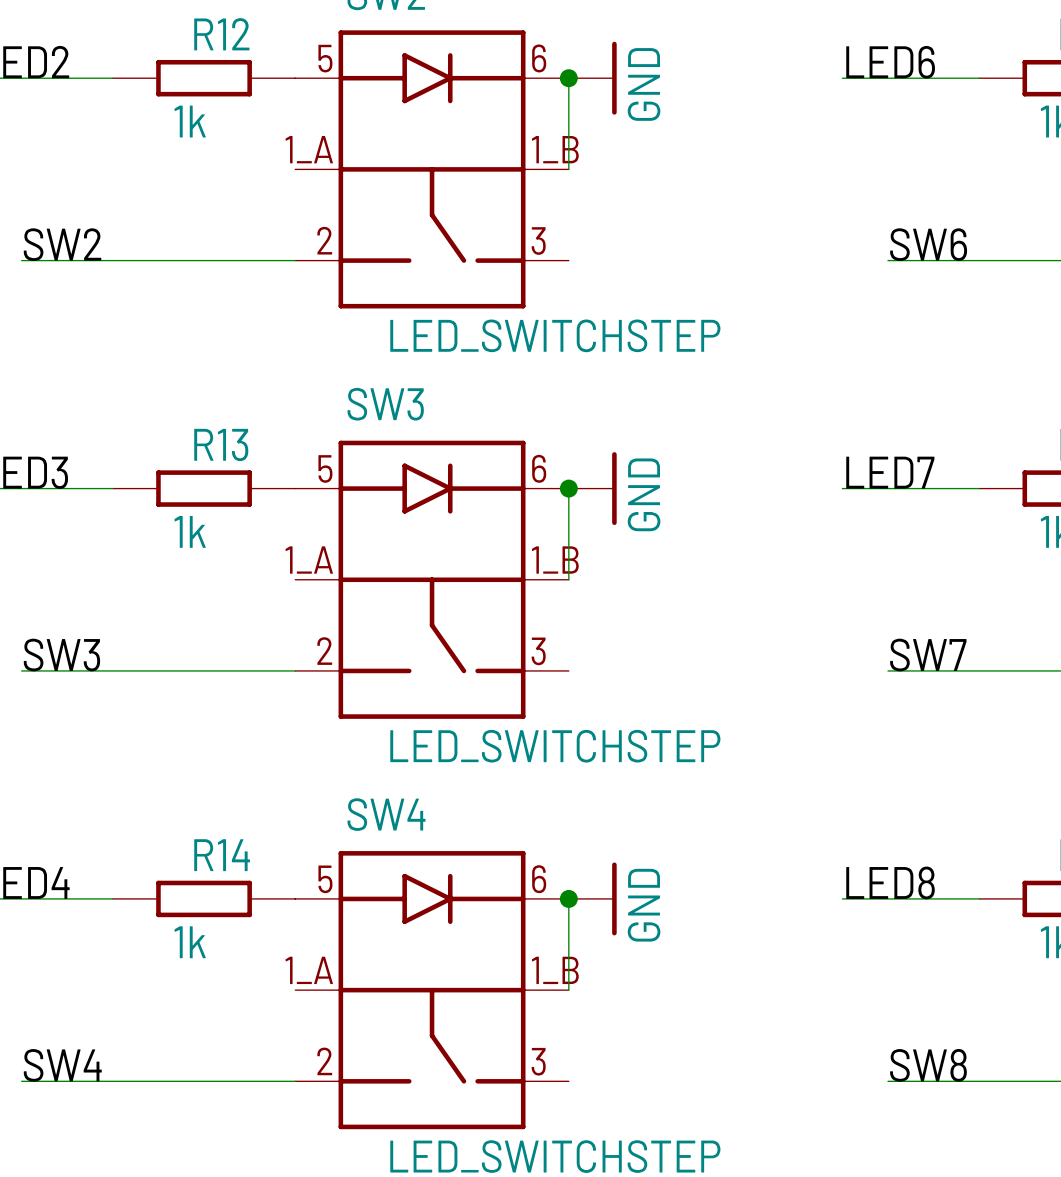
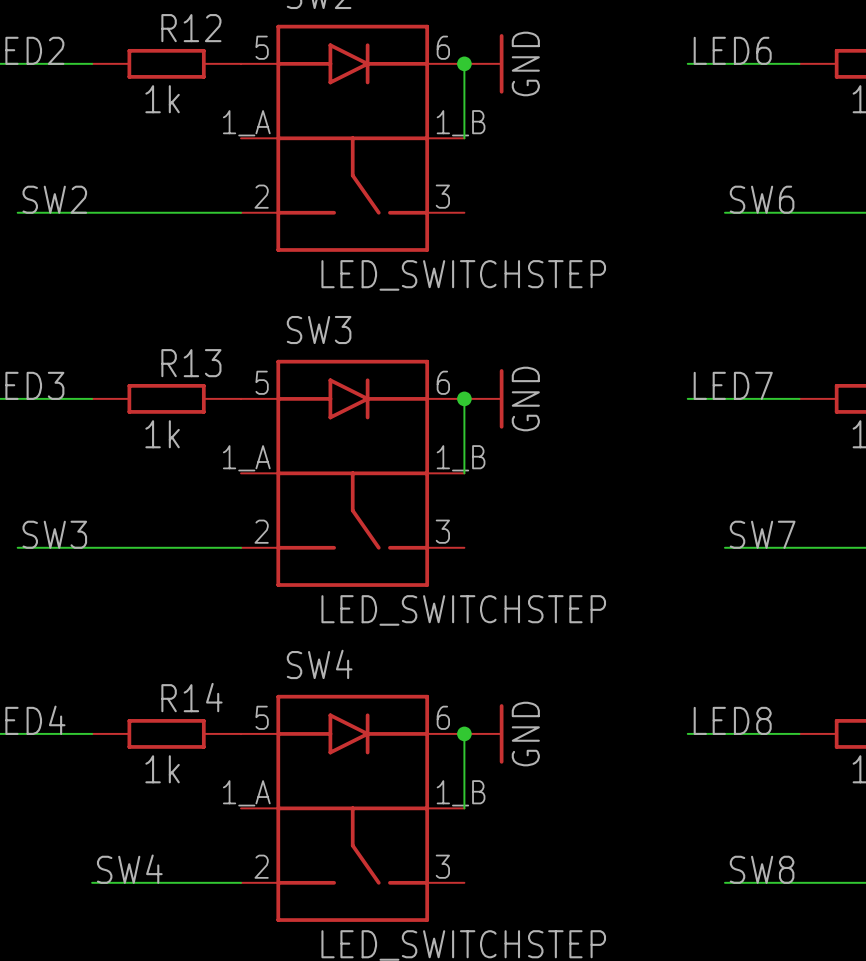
label position: SW4 (62, 1065) -> SW4 (129, 869)
wire: (21, 1081) (112, 1081) -> none

